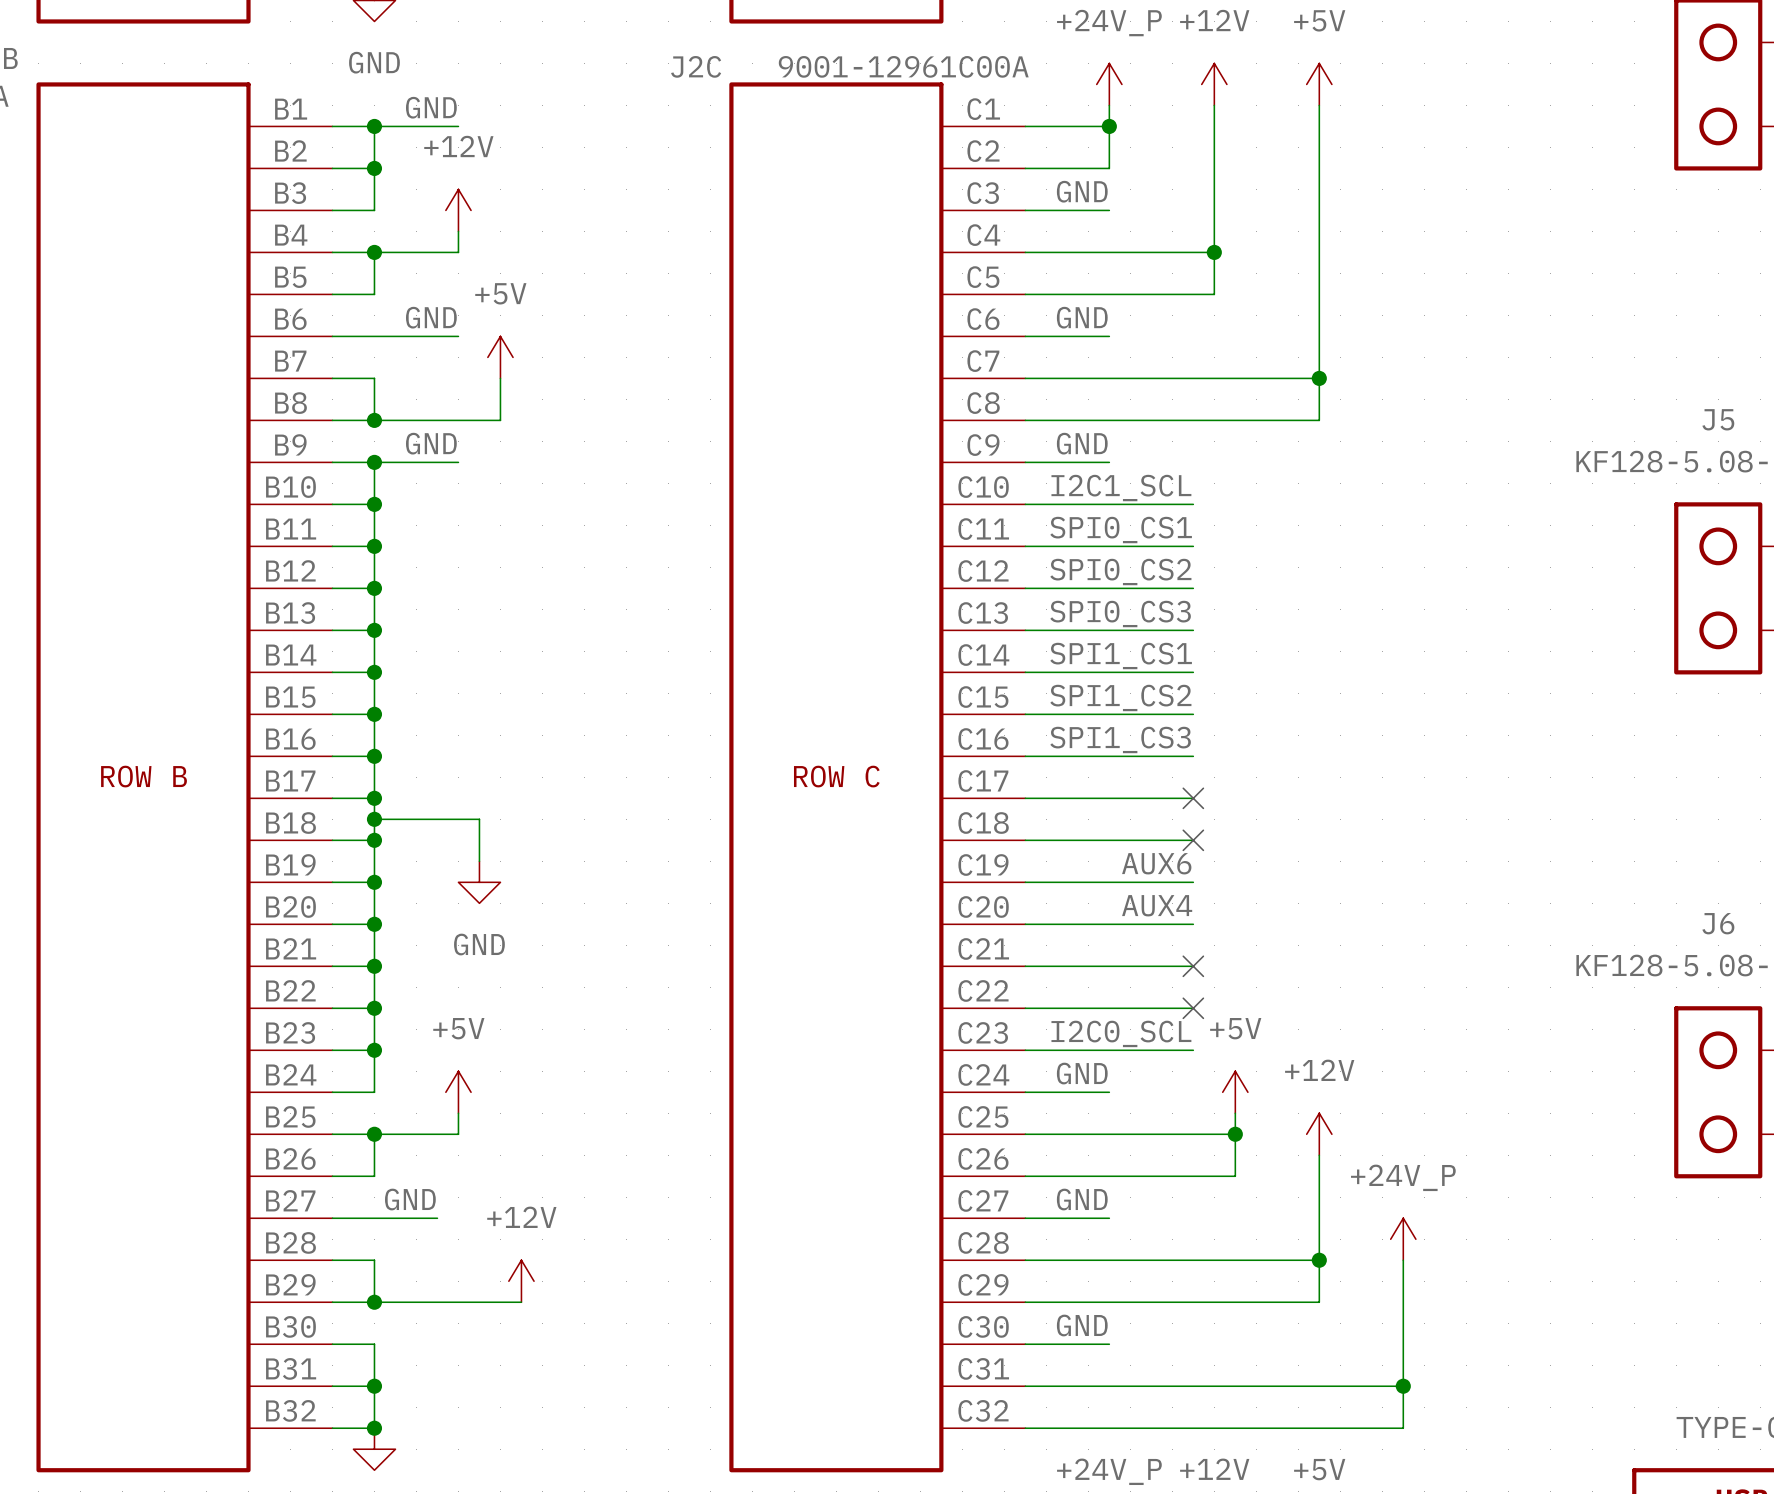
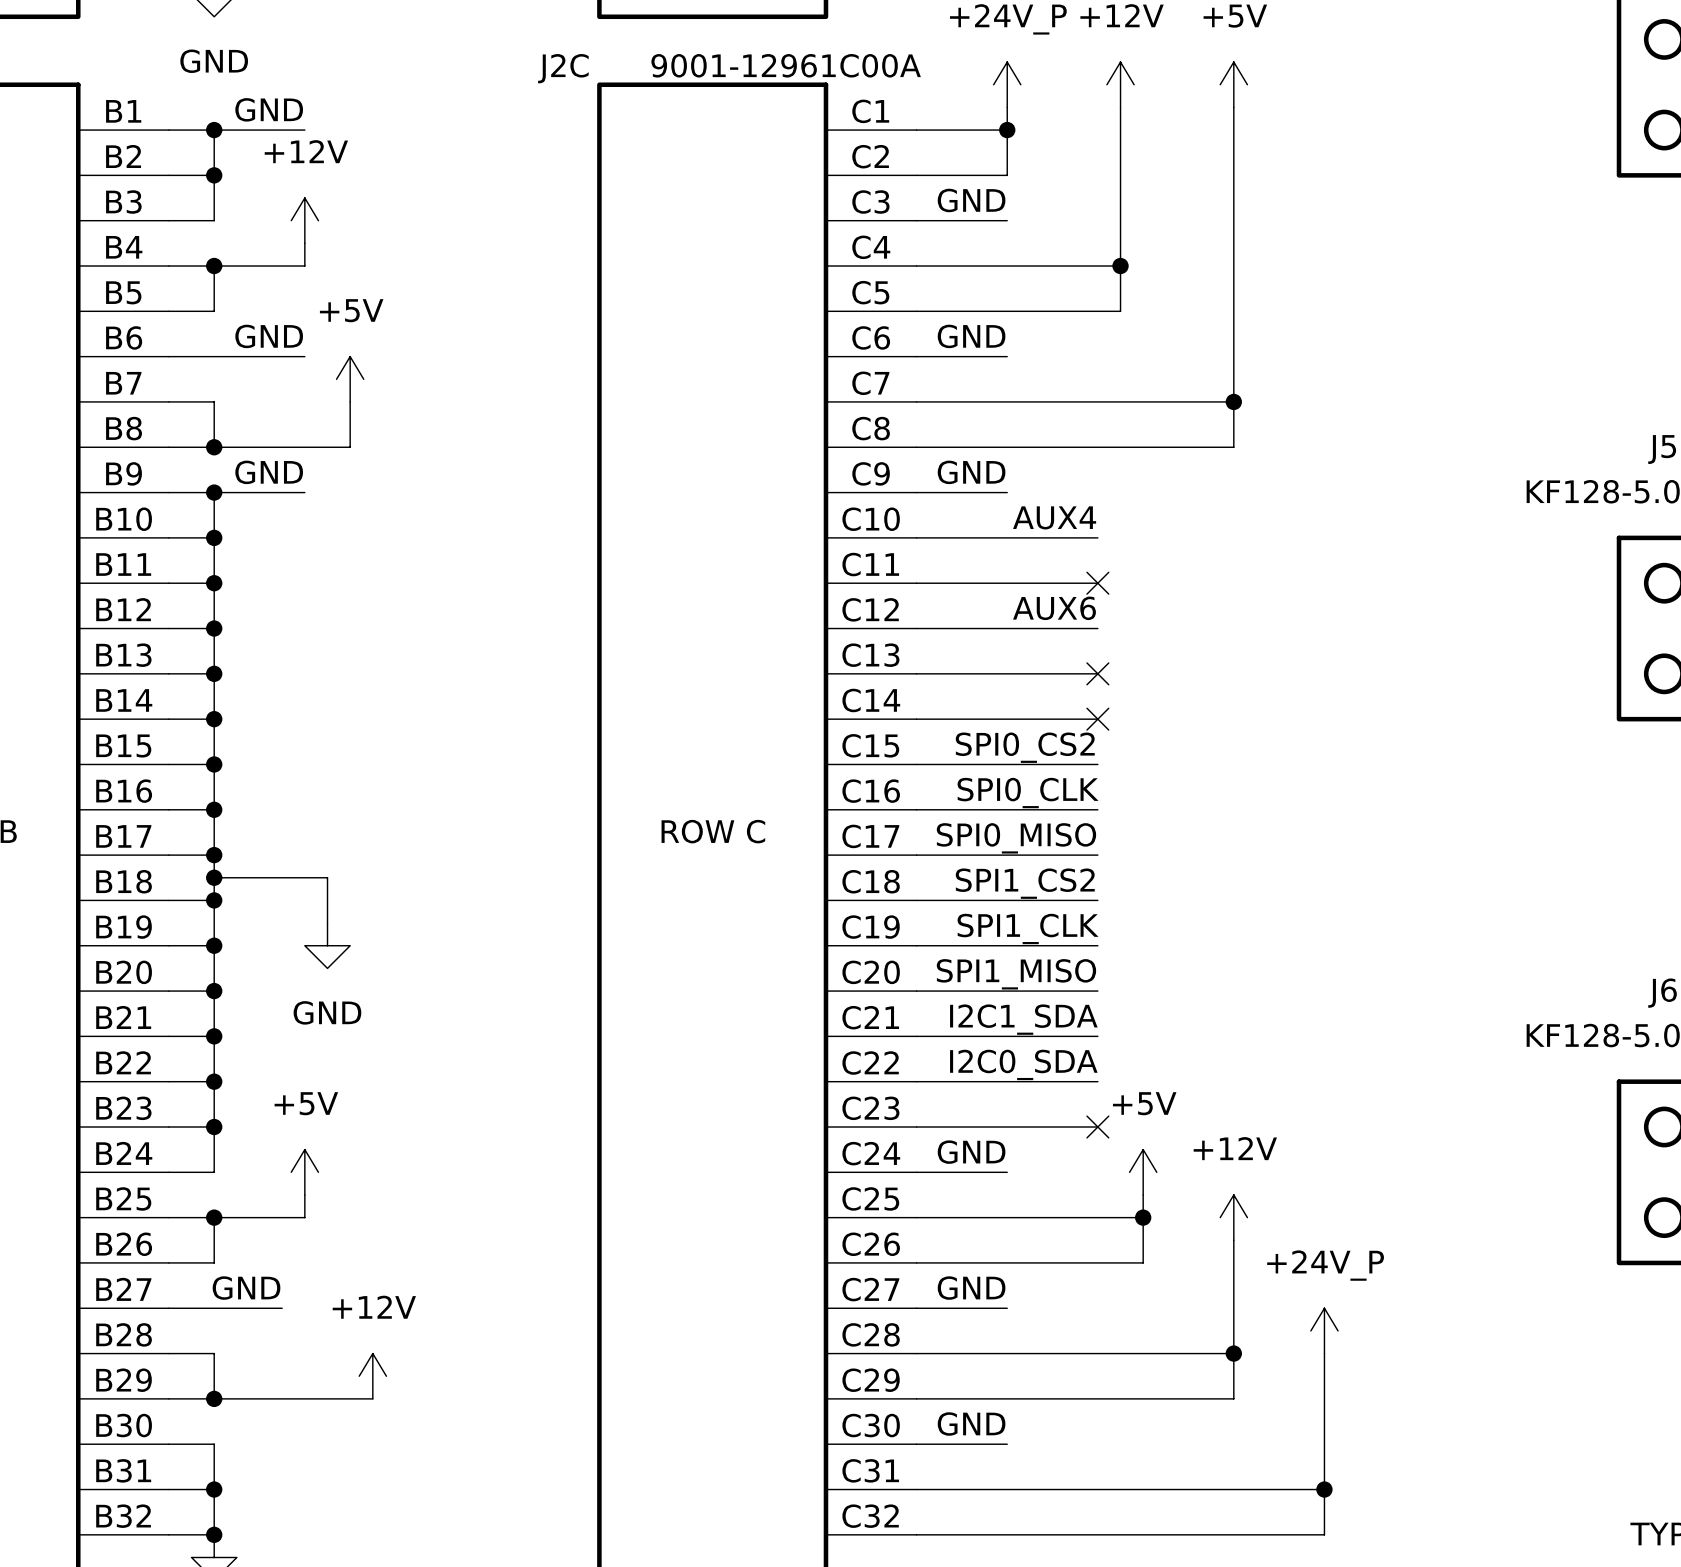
label: I2C1_SCL (1121, 488) -> AUX4 (1054, 517)
label: SPI0_CS1 (1121, 530) -> none
no-connect mark: none -> (1097, 583)
label: SPI0_CS2 (1120, 571) -> AUX6 (1054, 608)
label: SPI0_CS3 (1120, 613) -> none
no-connect mark: none -> (1097, 673)
label: SPI1_CS1 (1121, 655) -> none
no-connect mark: none -> (1097, 719)
label: SPI1_CS2 (1120, 697) -> SPI0_CS2 (1025, 747)
label: SPI1_CS3 (1120, 739) -> SPI0_CLK (1028, 793)
label: none -> SPI0_MISO (1016, 838)
no-connect mark: (1193, 798) -> none
label: none -> SPI1_CS2 (1025, 883)
no-connect mark: (1193, 840) -> none
label: AUX6 (1156, 863) -> SPI1_CLK (1028, 928)
label: AUX4 (1157, 905) -> SPI1_MISO (1016, 974)
label: none -> I2C1_SDA (1023, 1019)
no-connect mark: (1193, 966) -> none
no-connect mark: (1193, 1008) -> none
label: I2C0_SCL (1121, 1033) -> I2C0_SDA (1023, 1064)
no-connect mark: none -> (1097, 1127)

